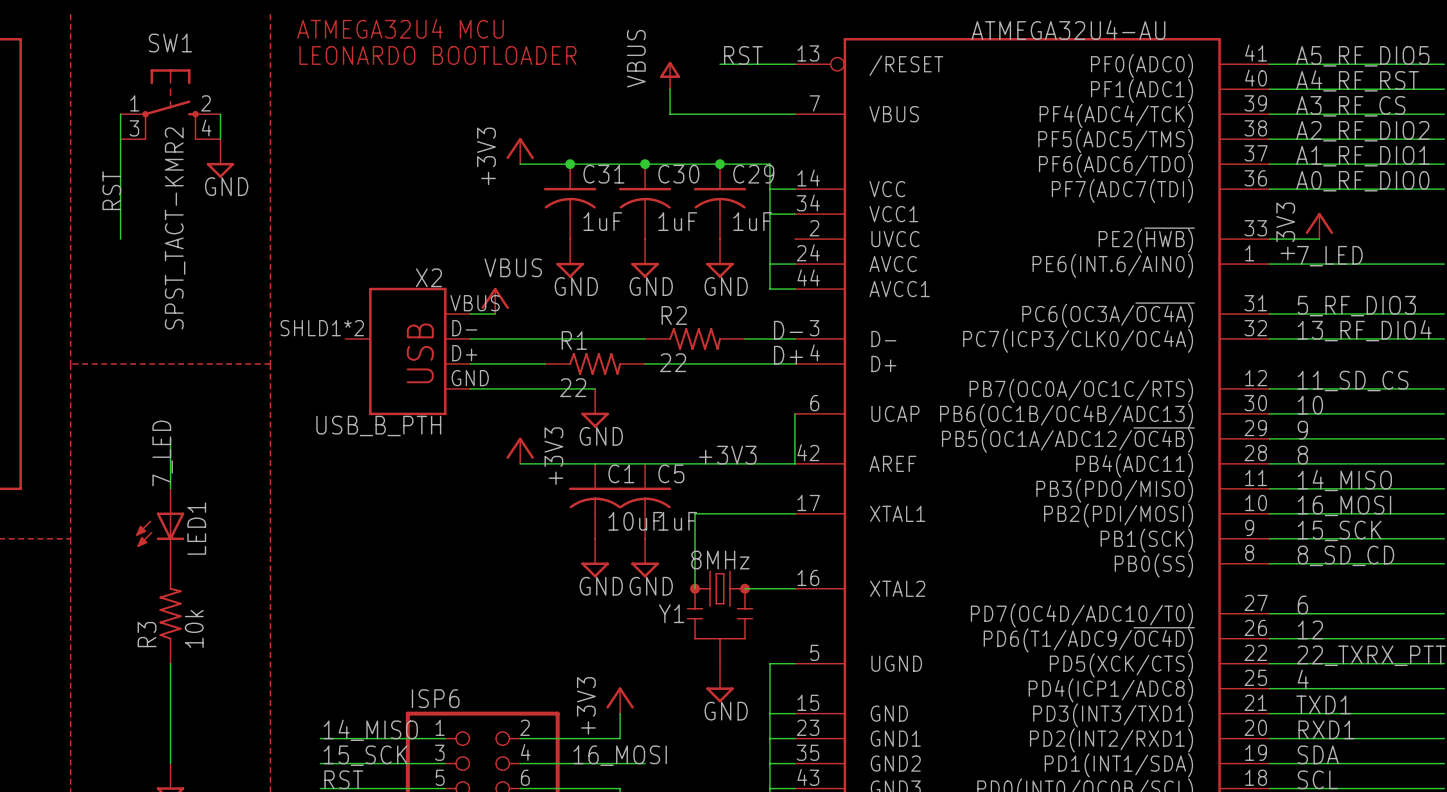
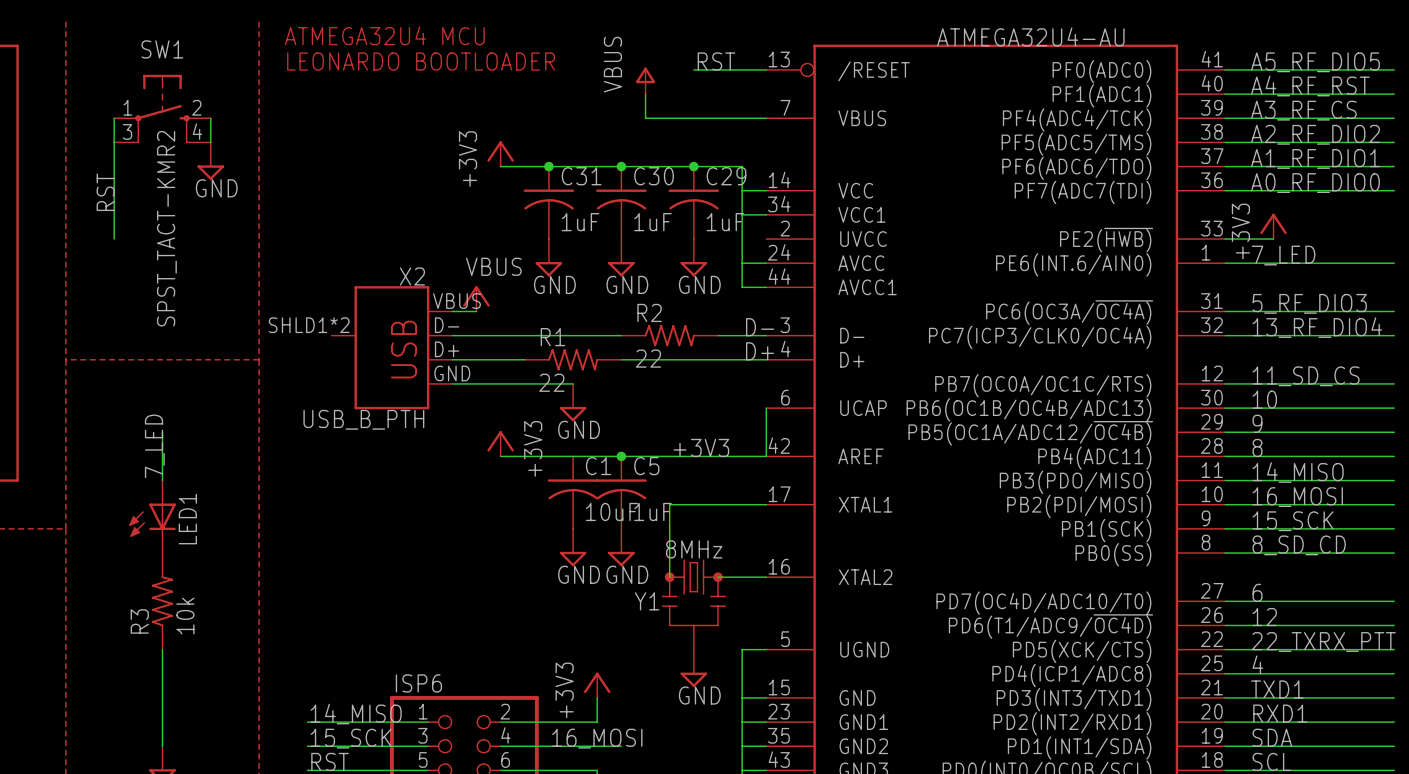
junction: none -> (621, 456)

